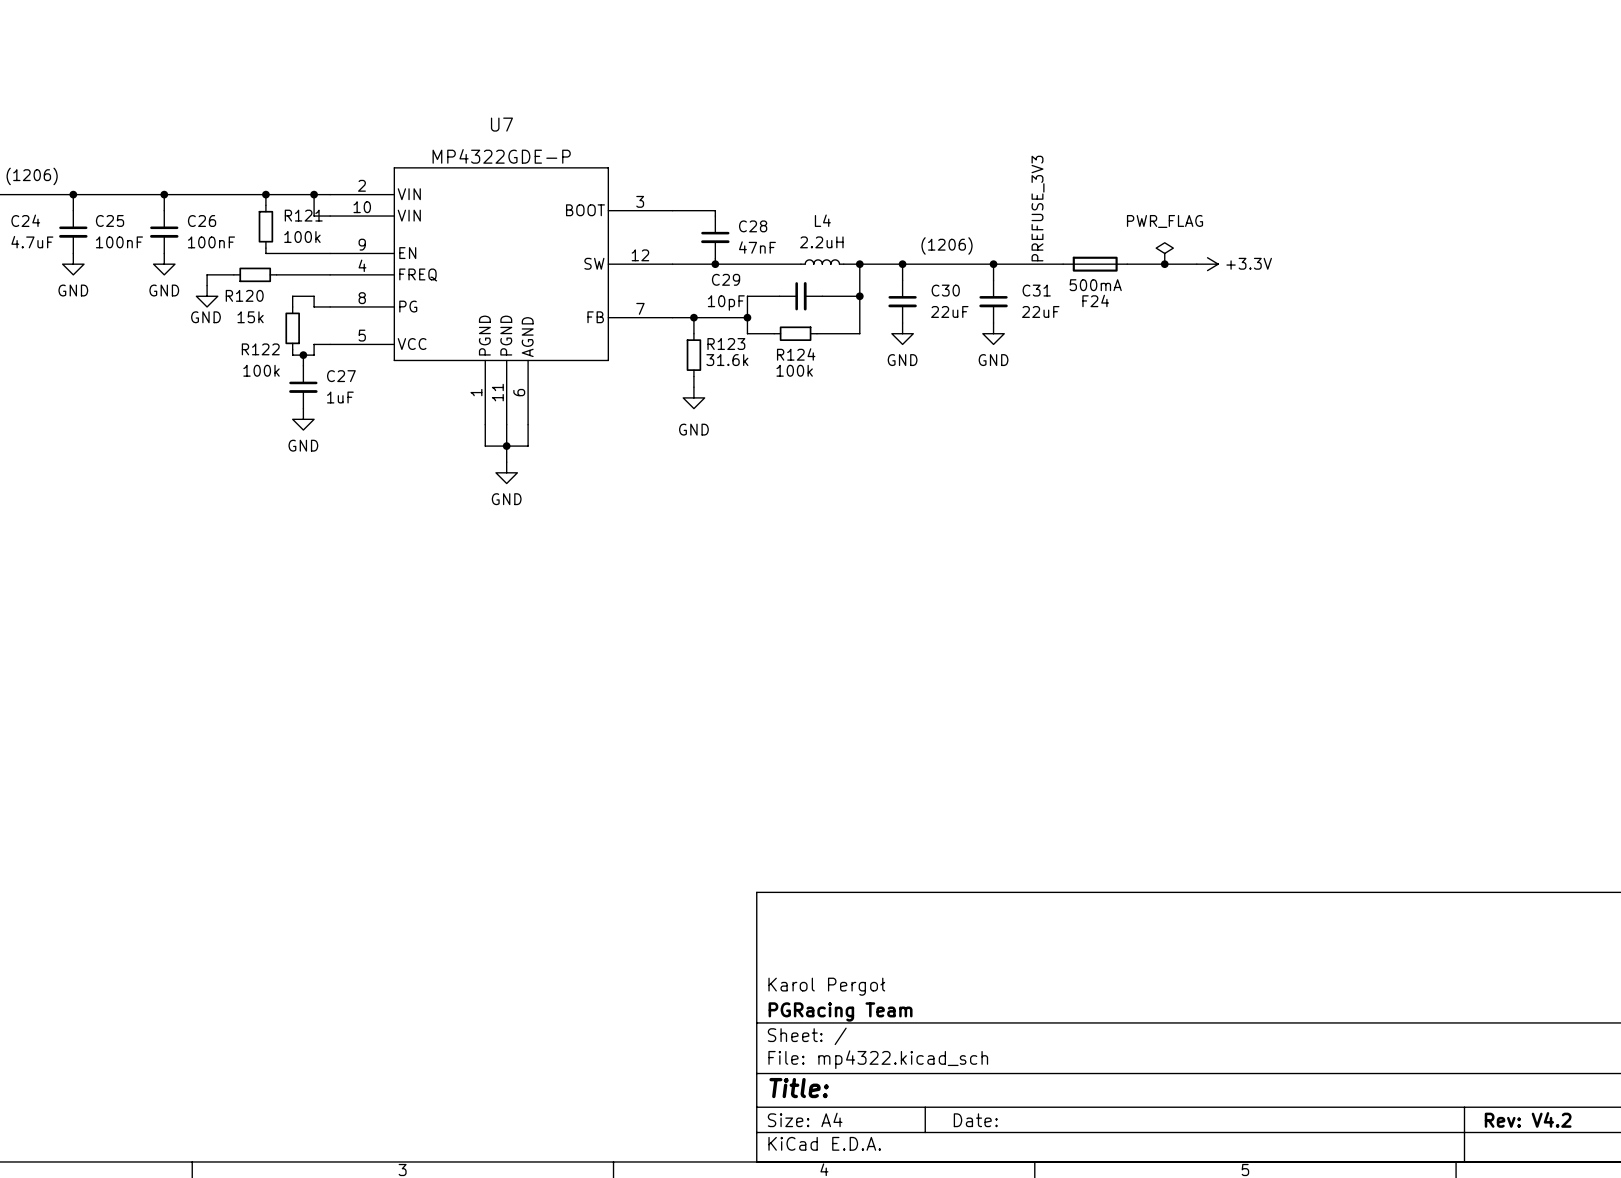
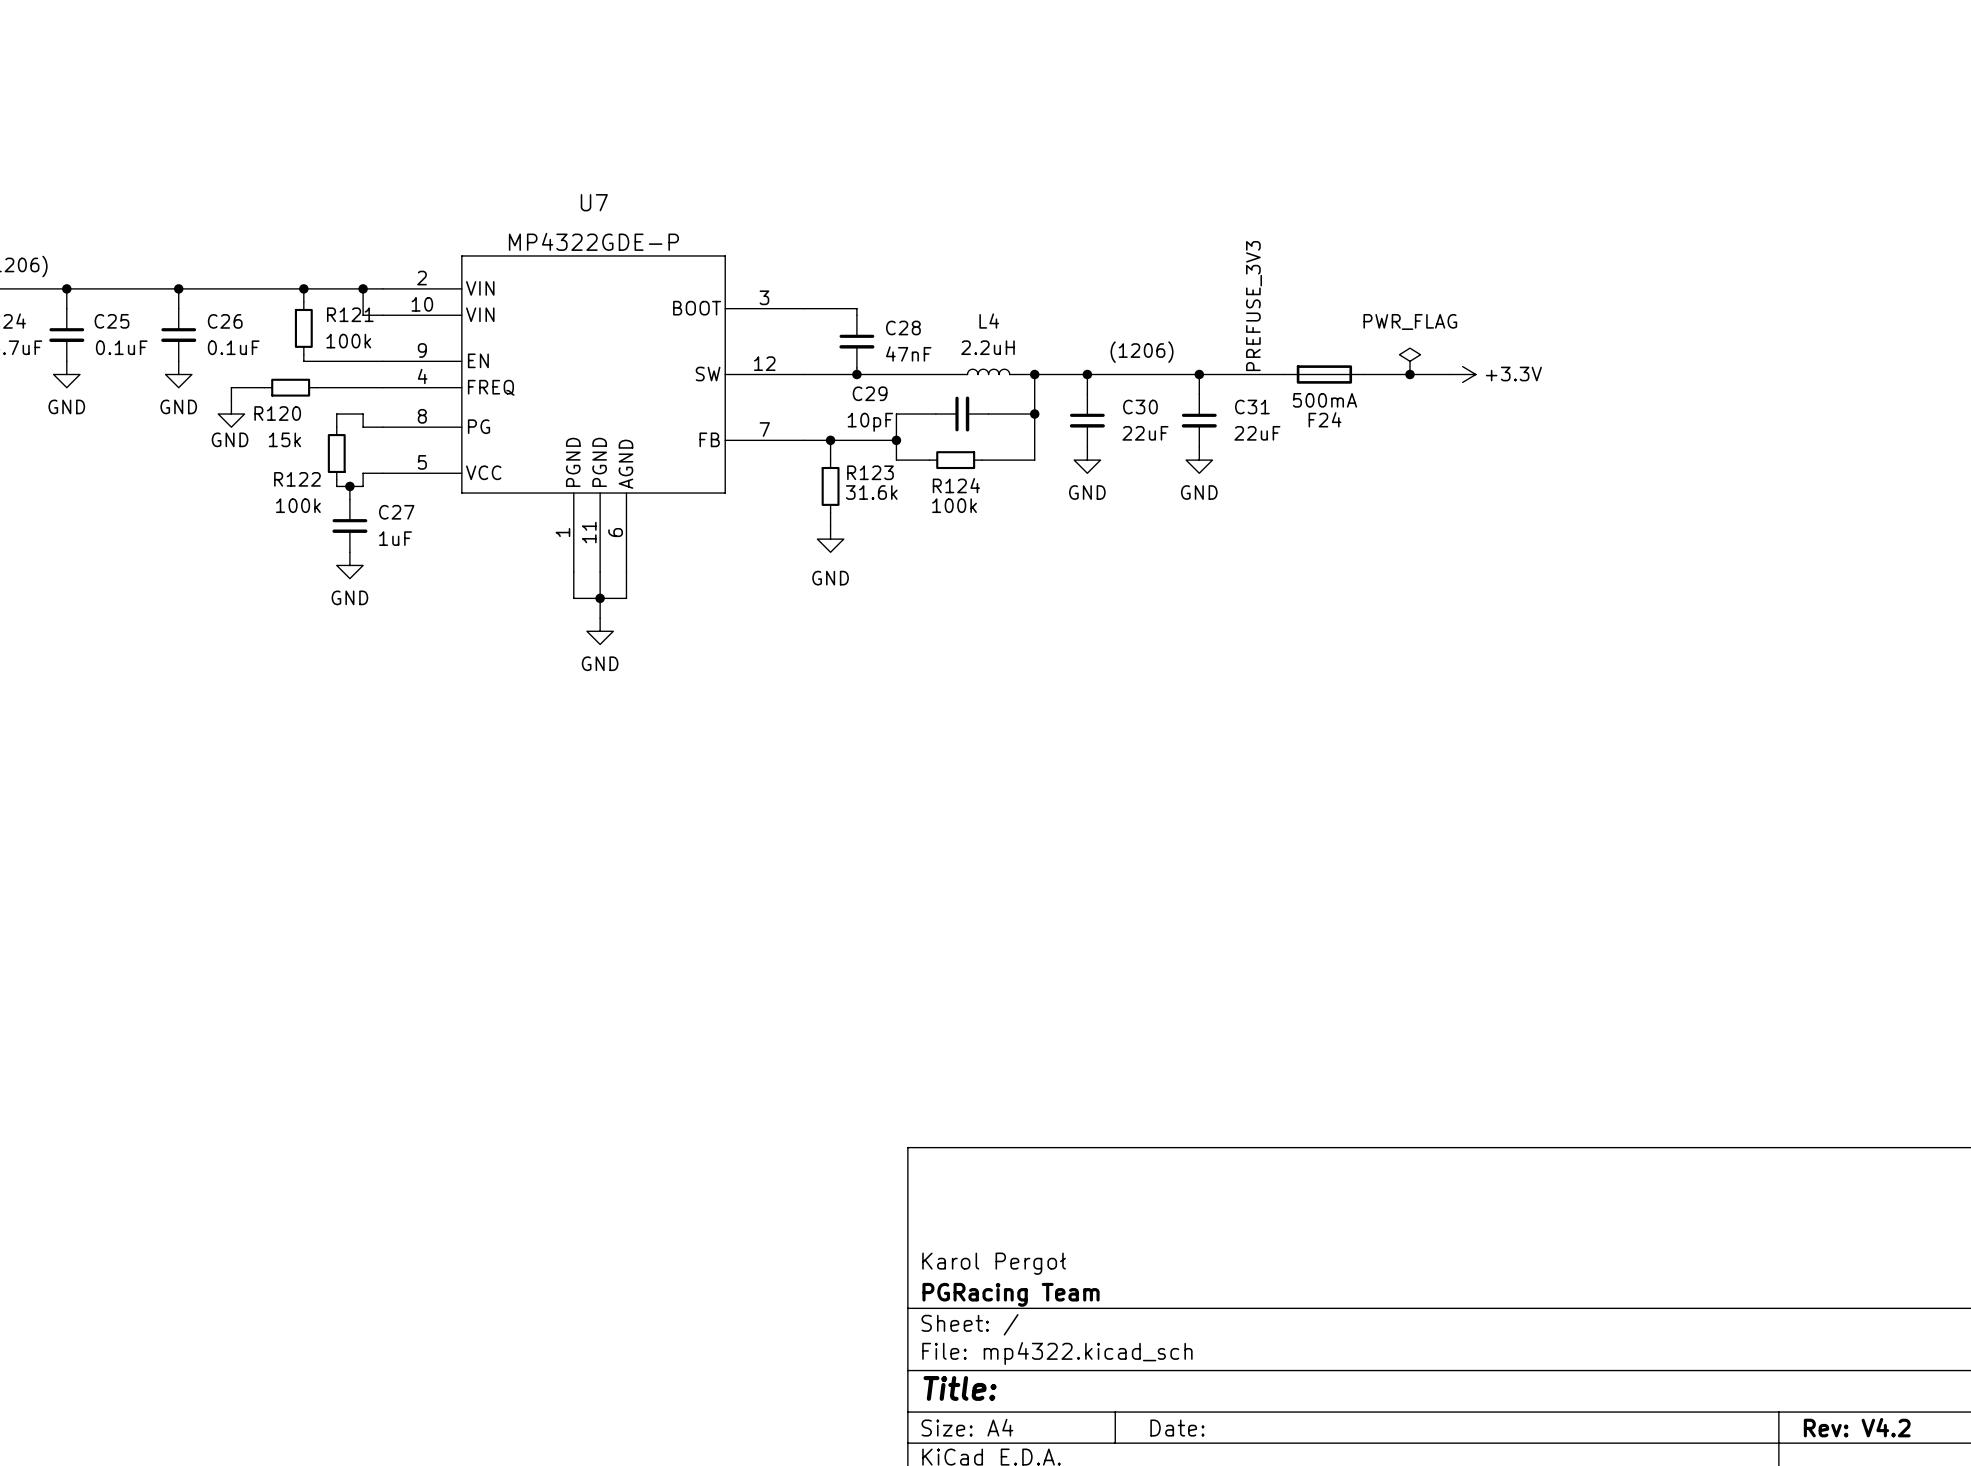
C25 value: 100nF (119, 242) -> 0.1uF (121, 347)
C26 value: 100nF (211, 242) -> 0.1uF (233, 347)

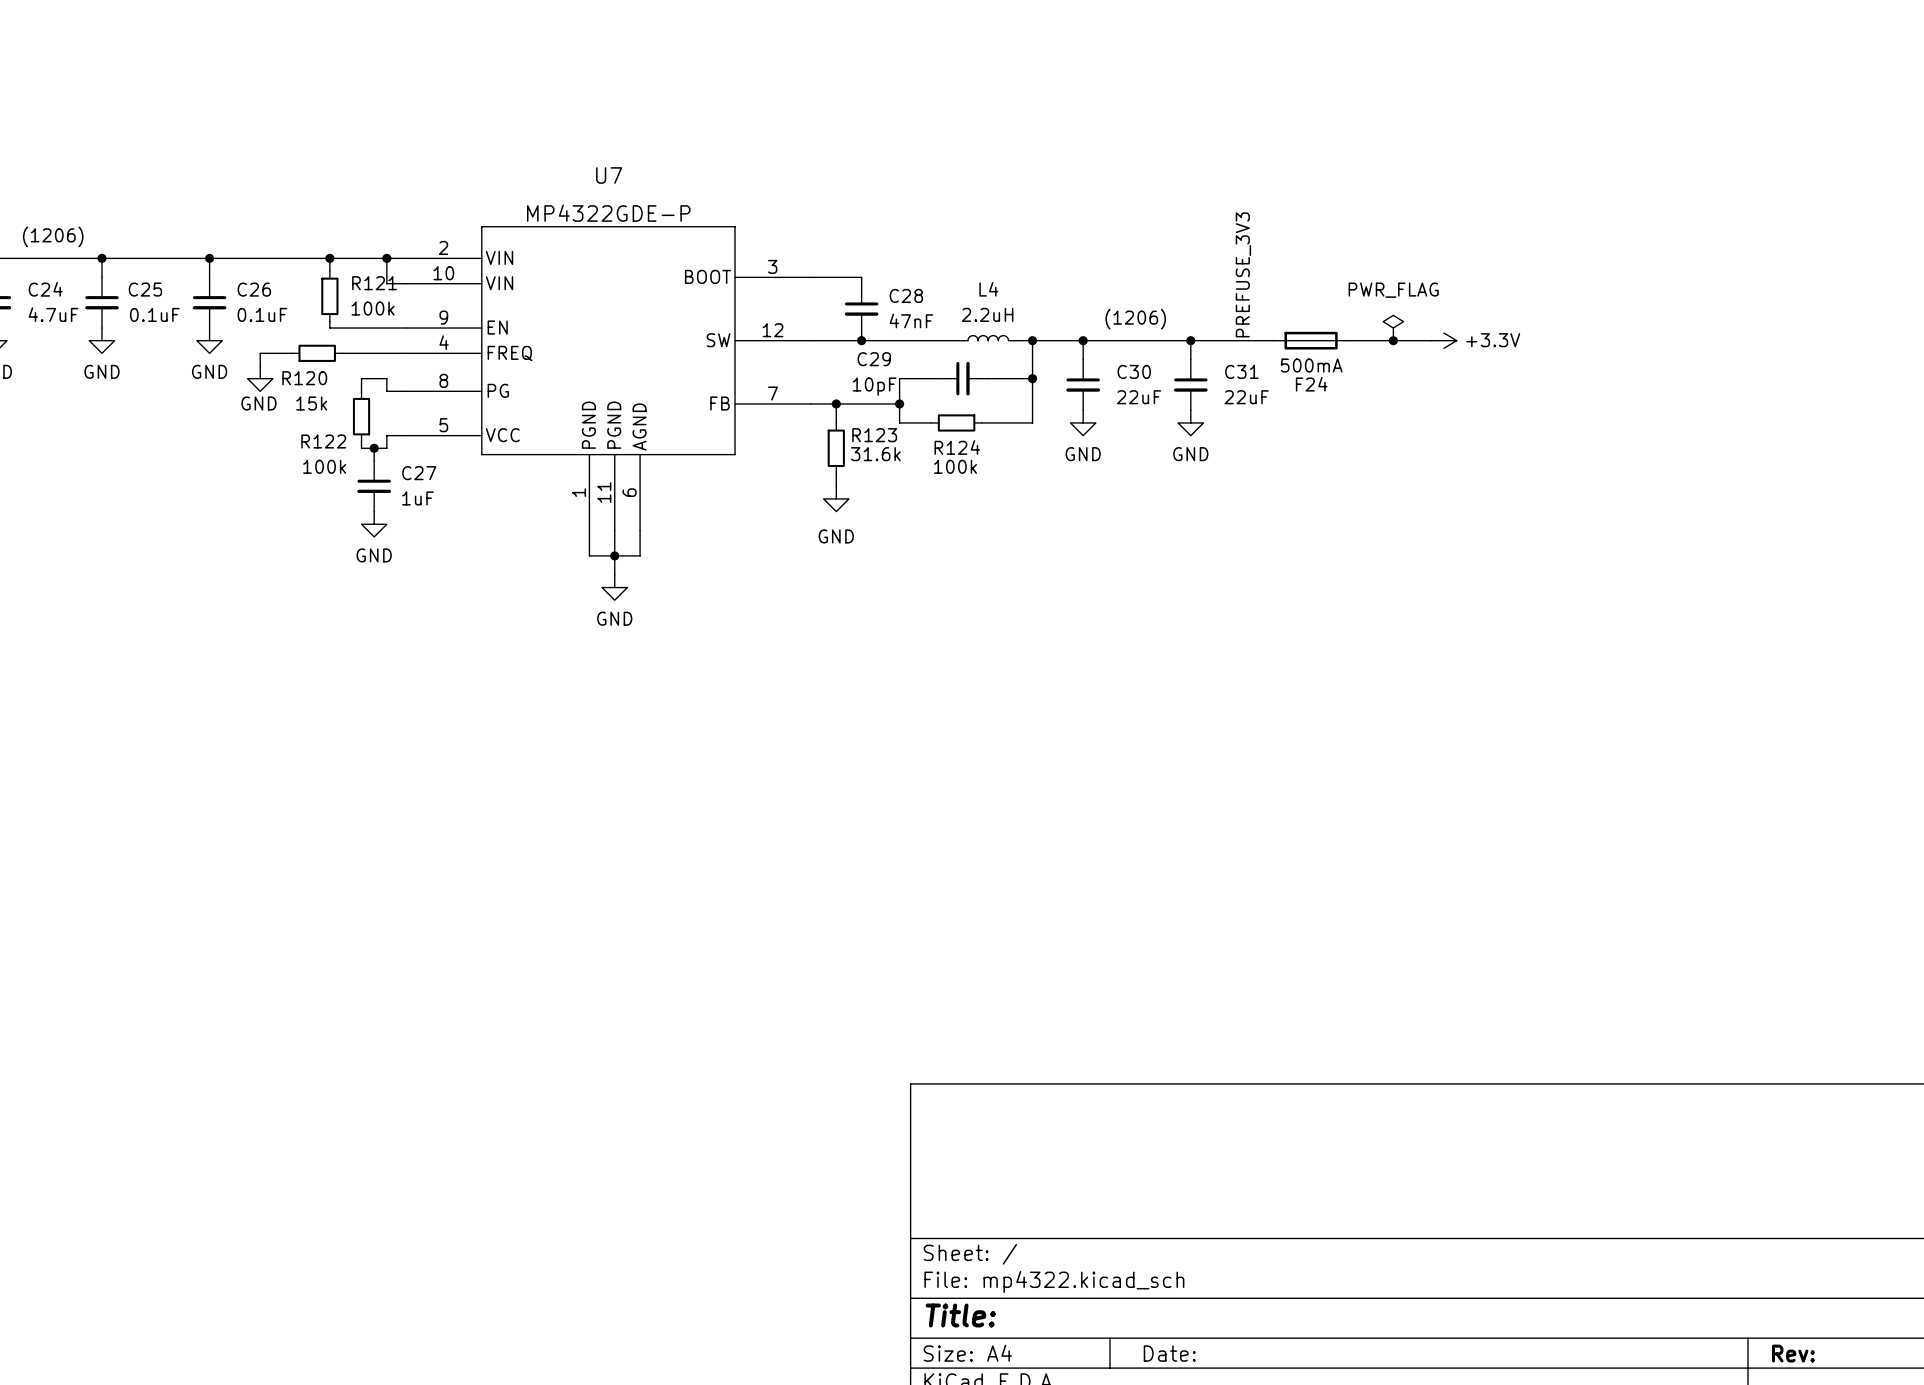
title block: Karol Pergoł (994, 1263) -> none
title block: PGRacing Team (1011, 1294) -> none
title block: Rev: V4.2 (1857, 1427) -> Rev: (1793, 1353)

